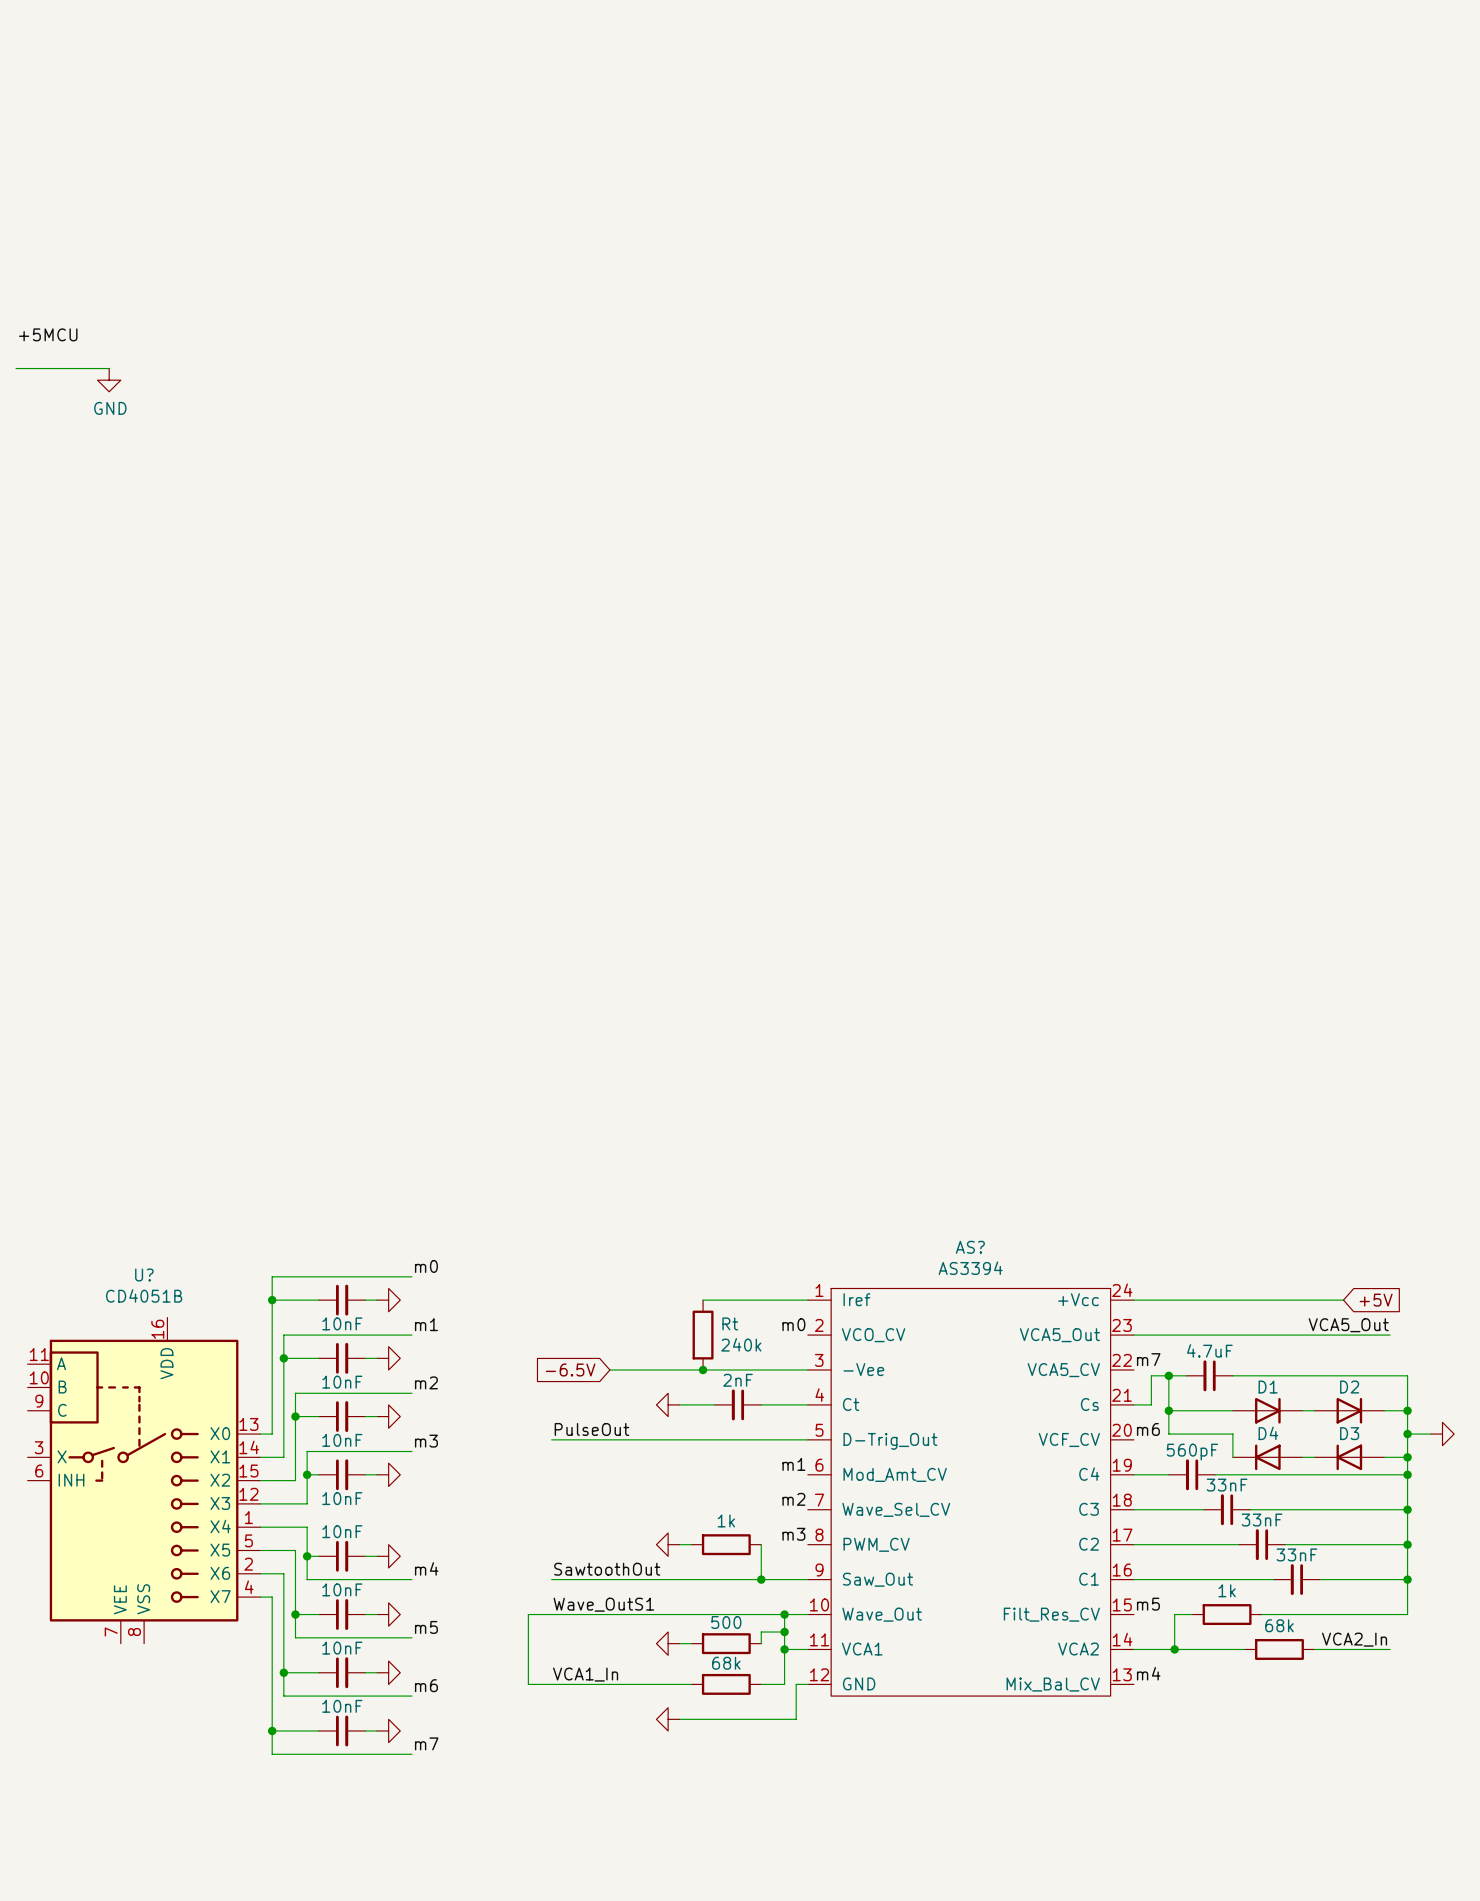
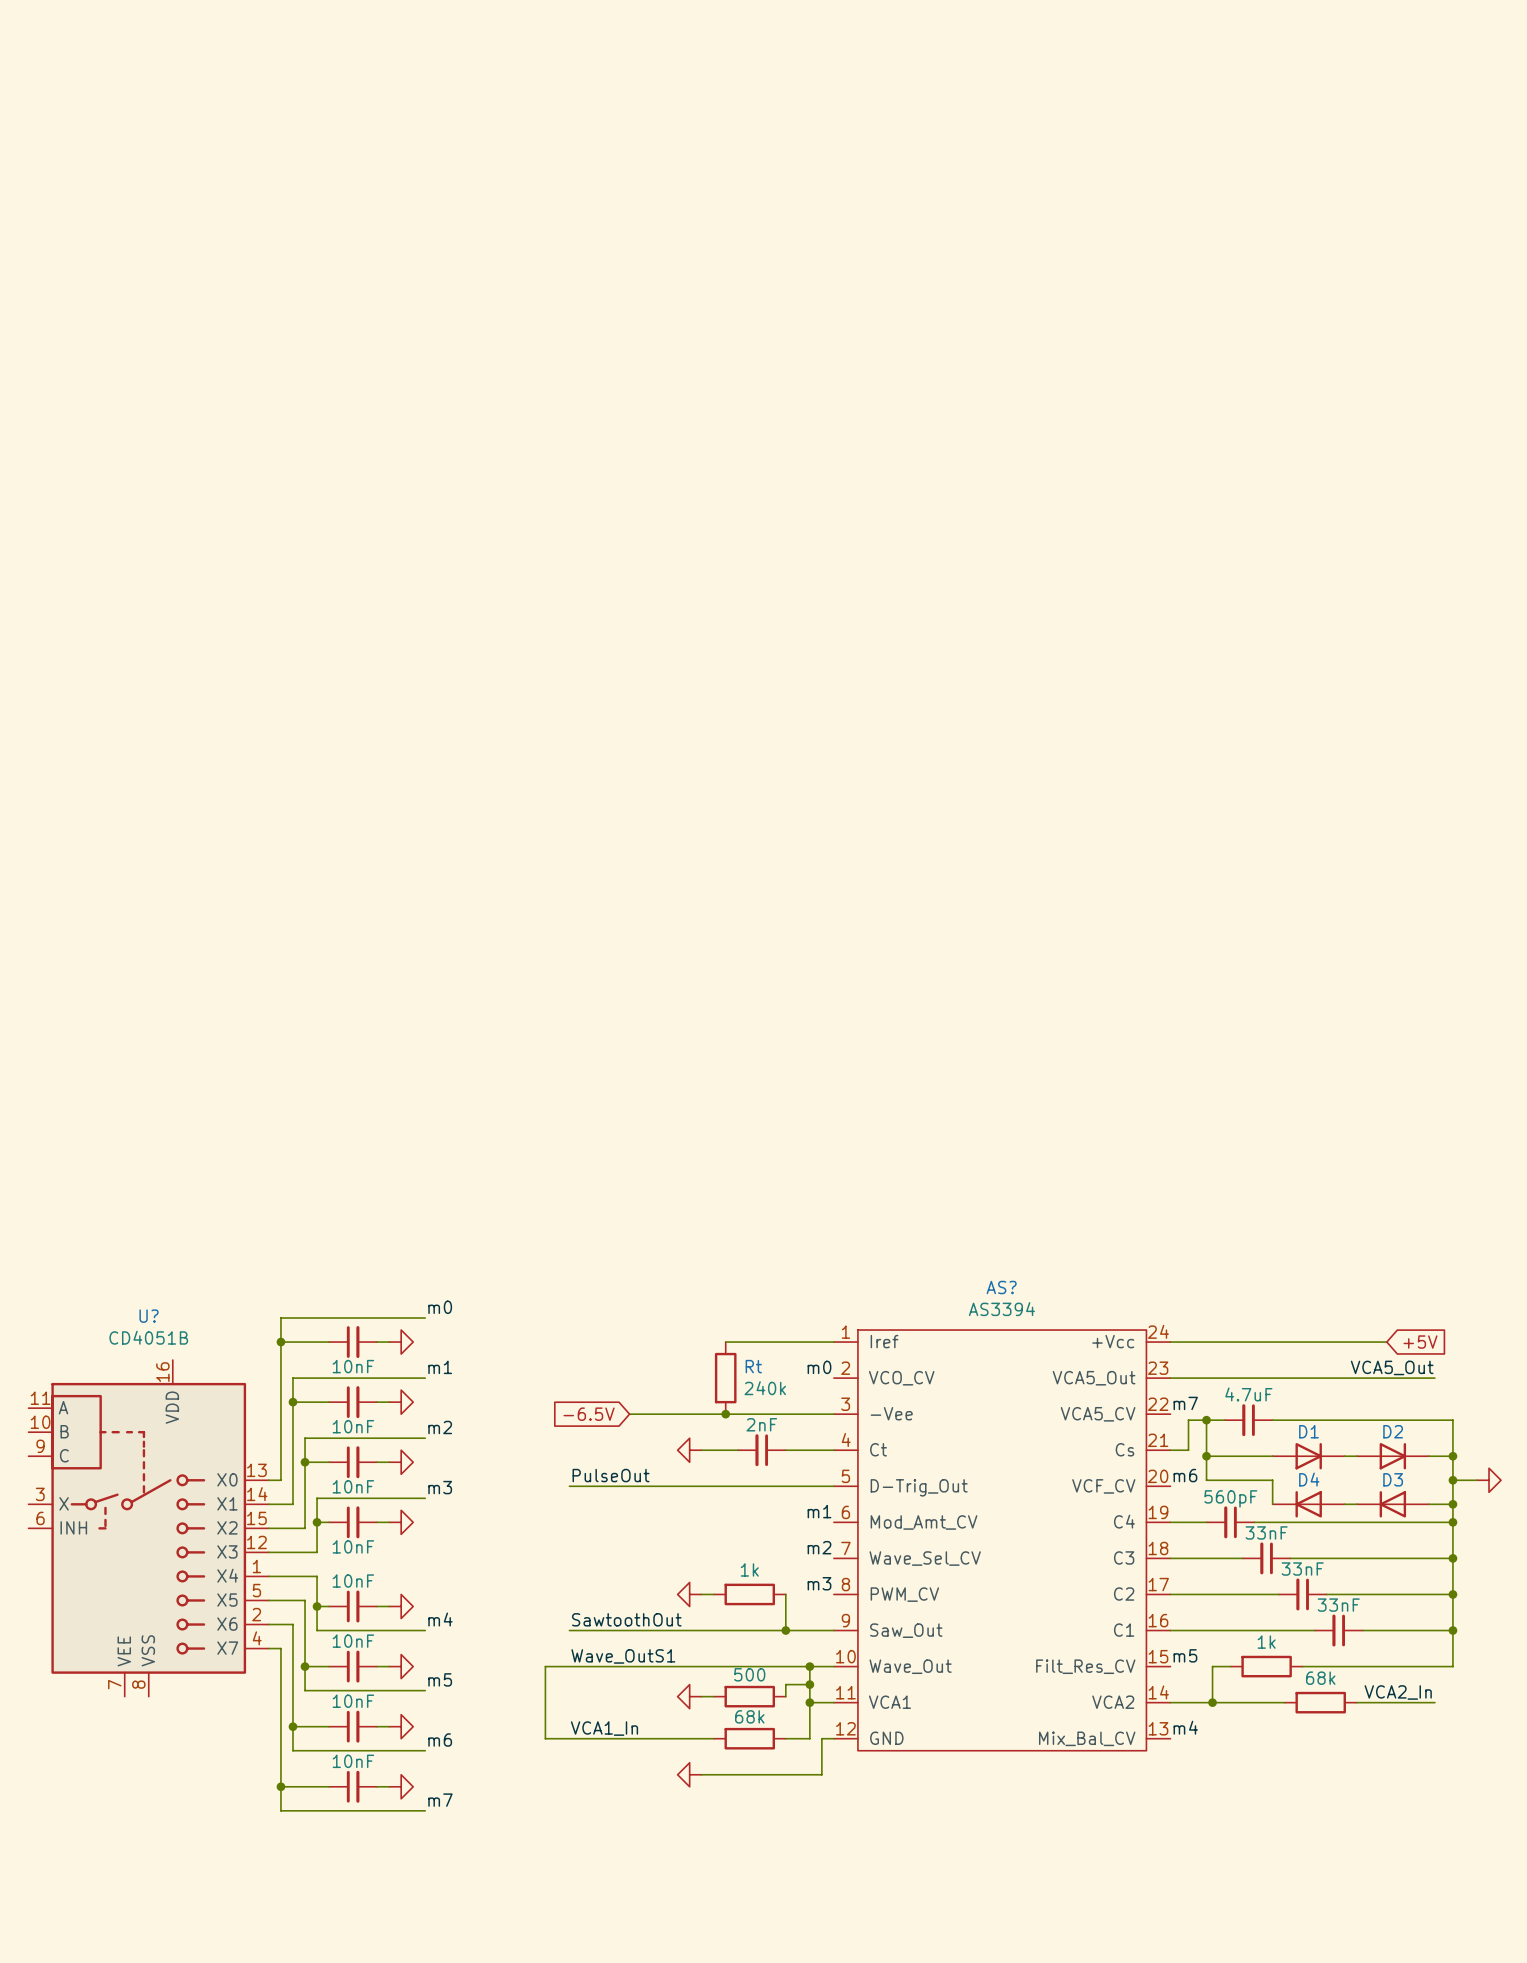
label: +5MCU (48, 334) -> none
wire: (16, 368) (109, 368) -> none
power symbol: GND (109, 380) -> none

